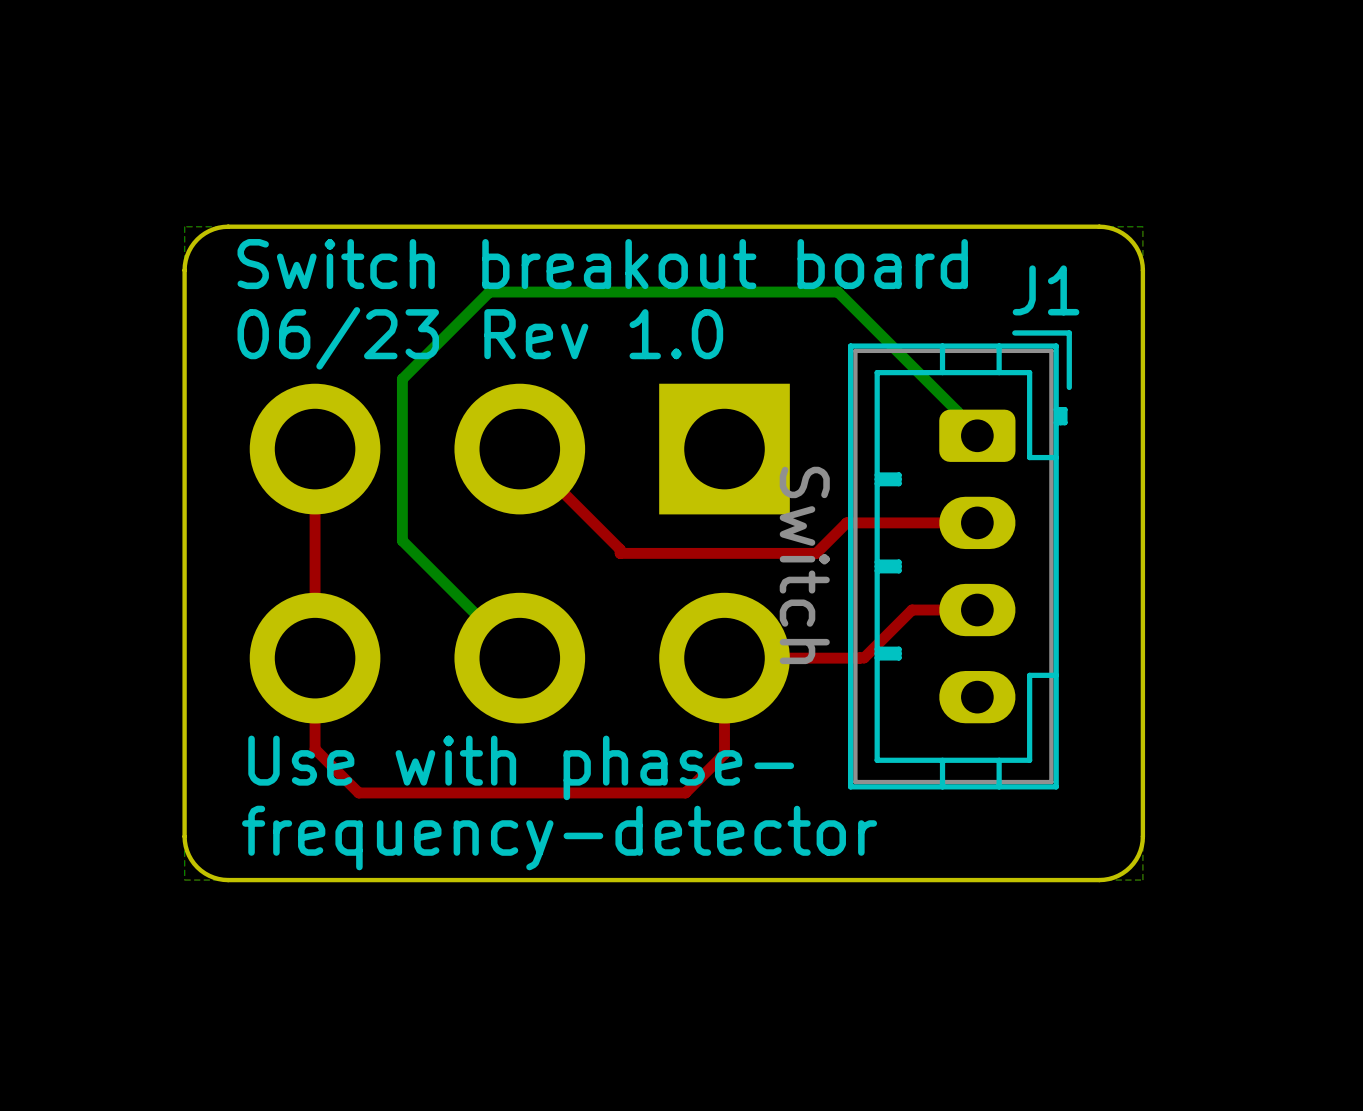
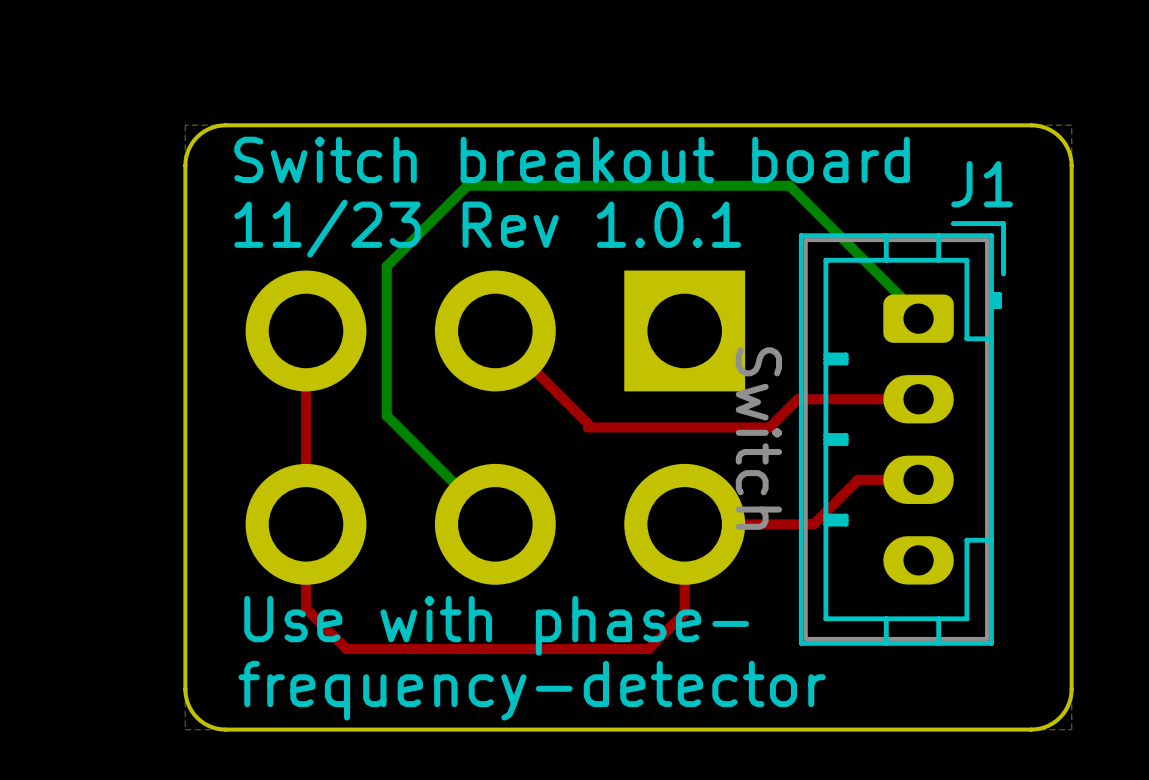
text: 06/23 Rev 1.0 (480, 338) -> 11/23 Rev 1.0.1 (487, 228)

